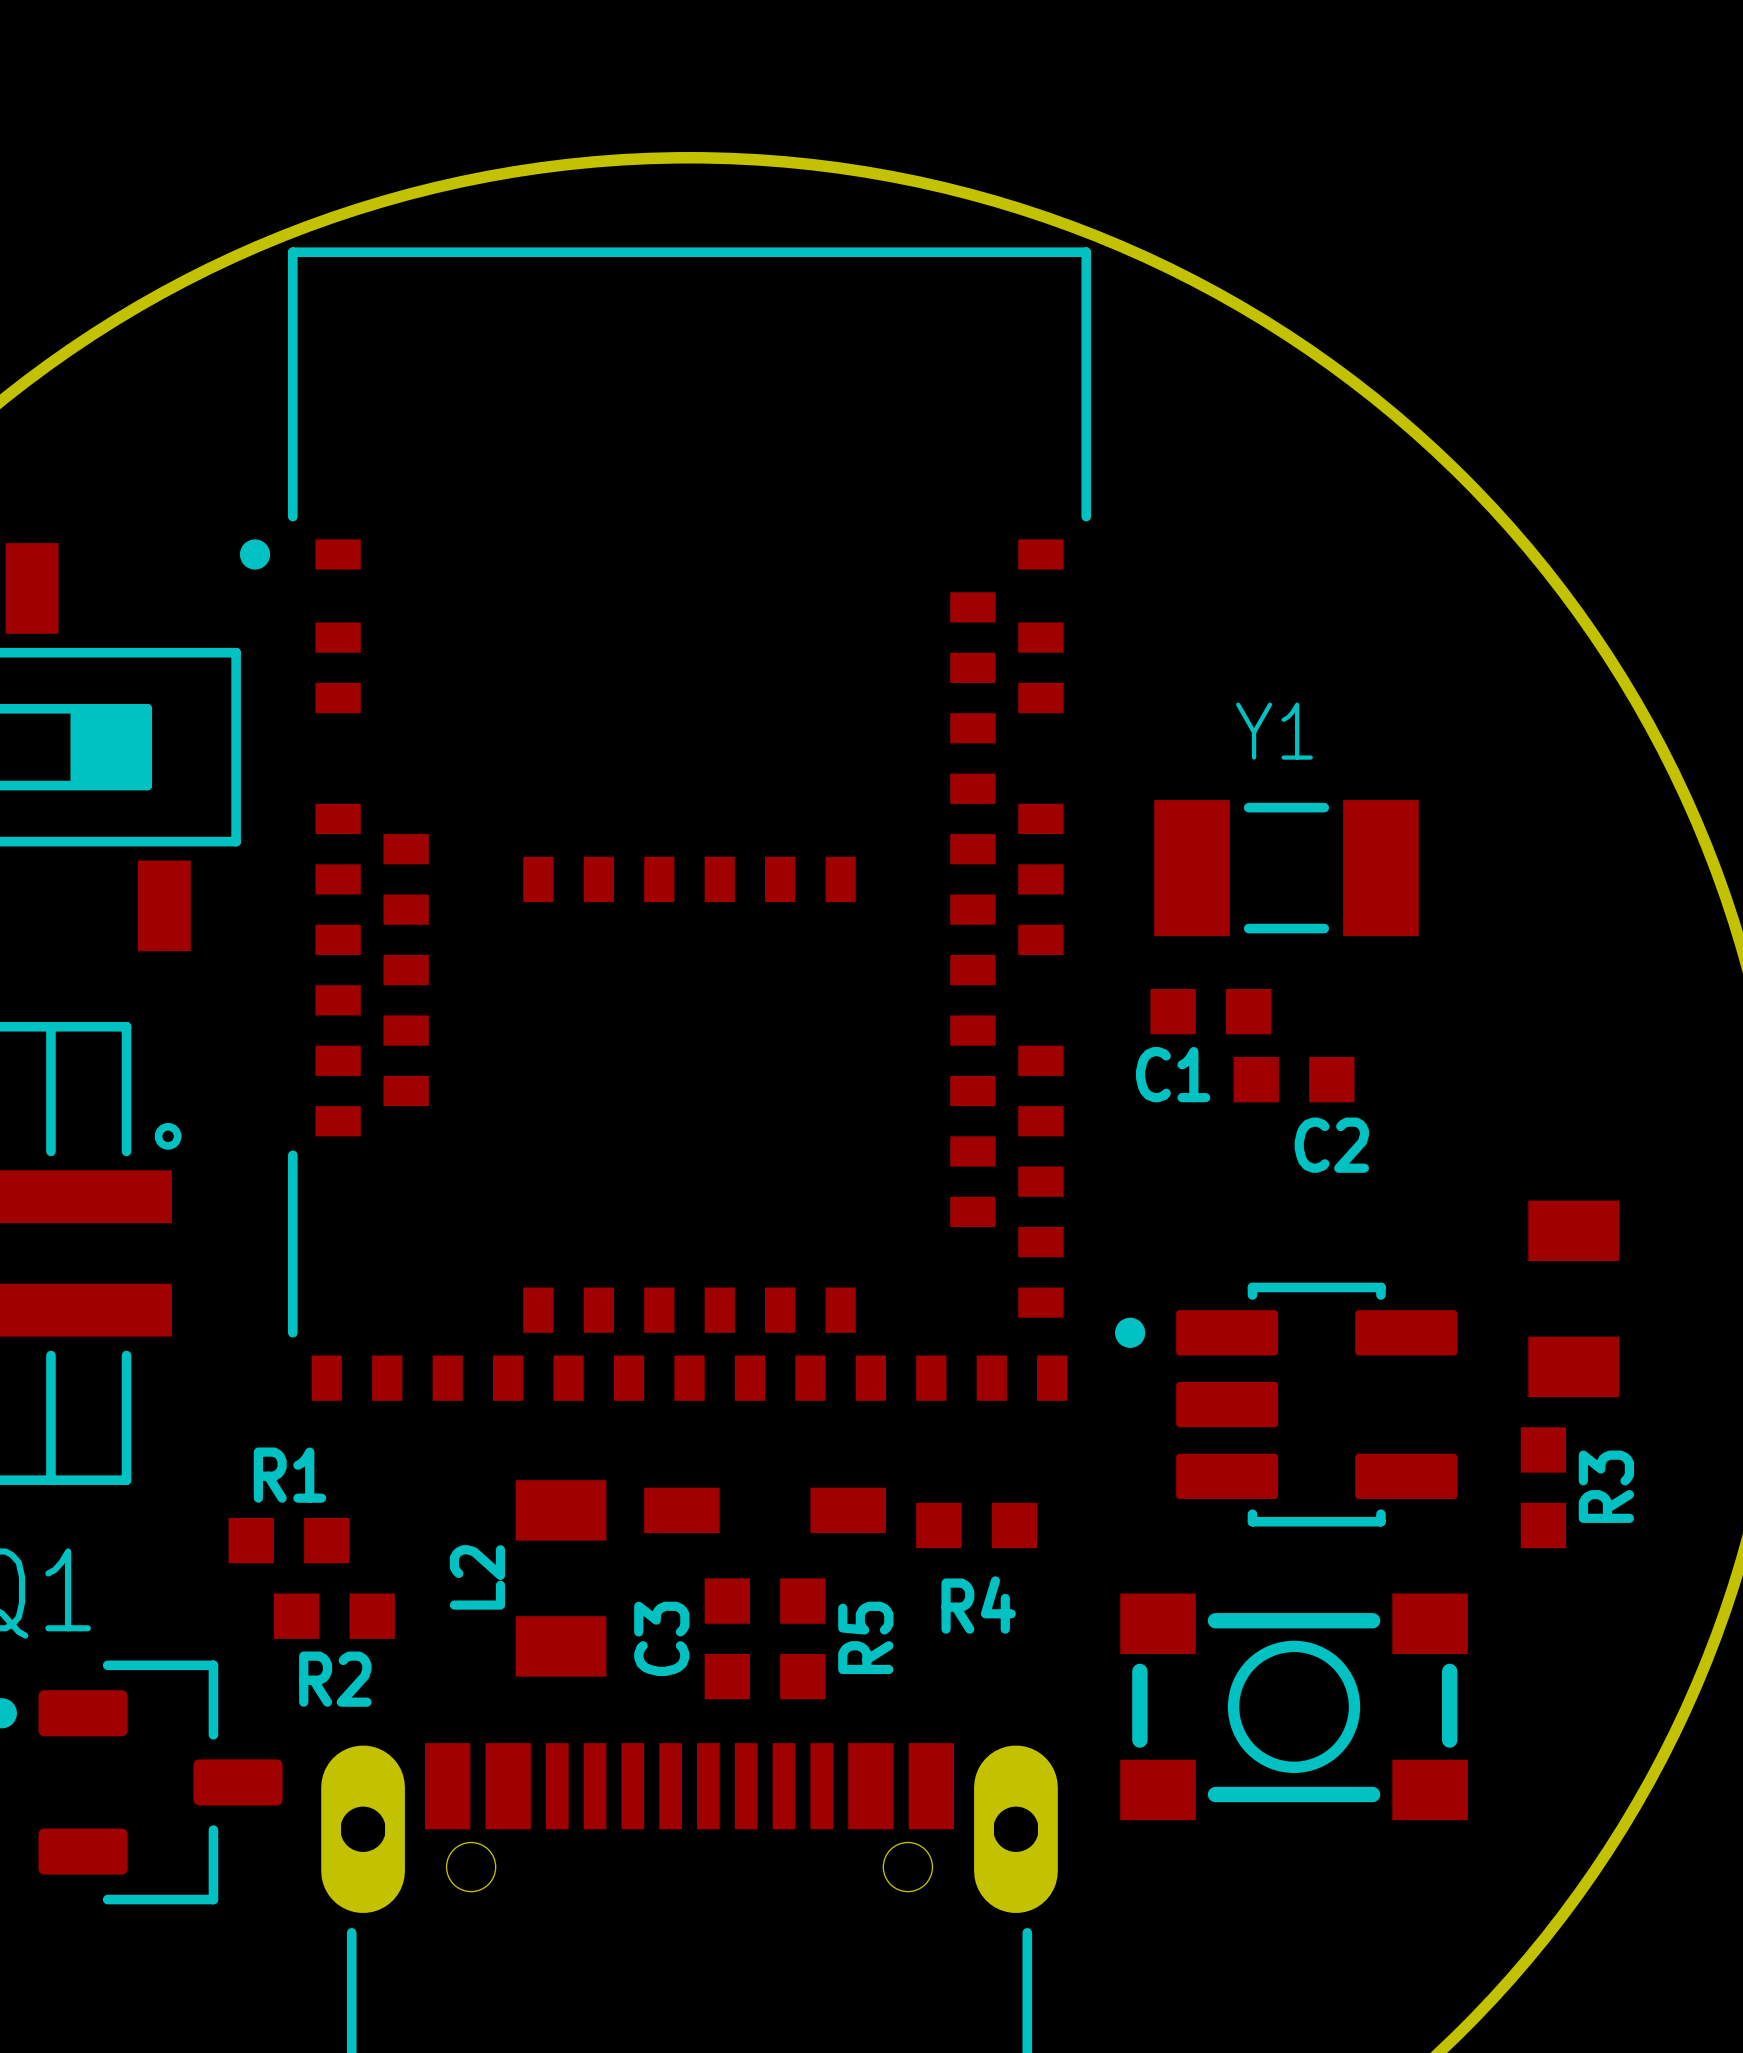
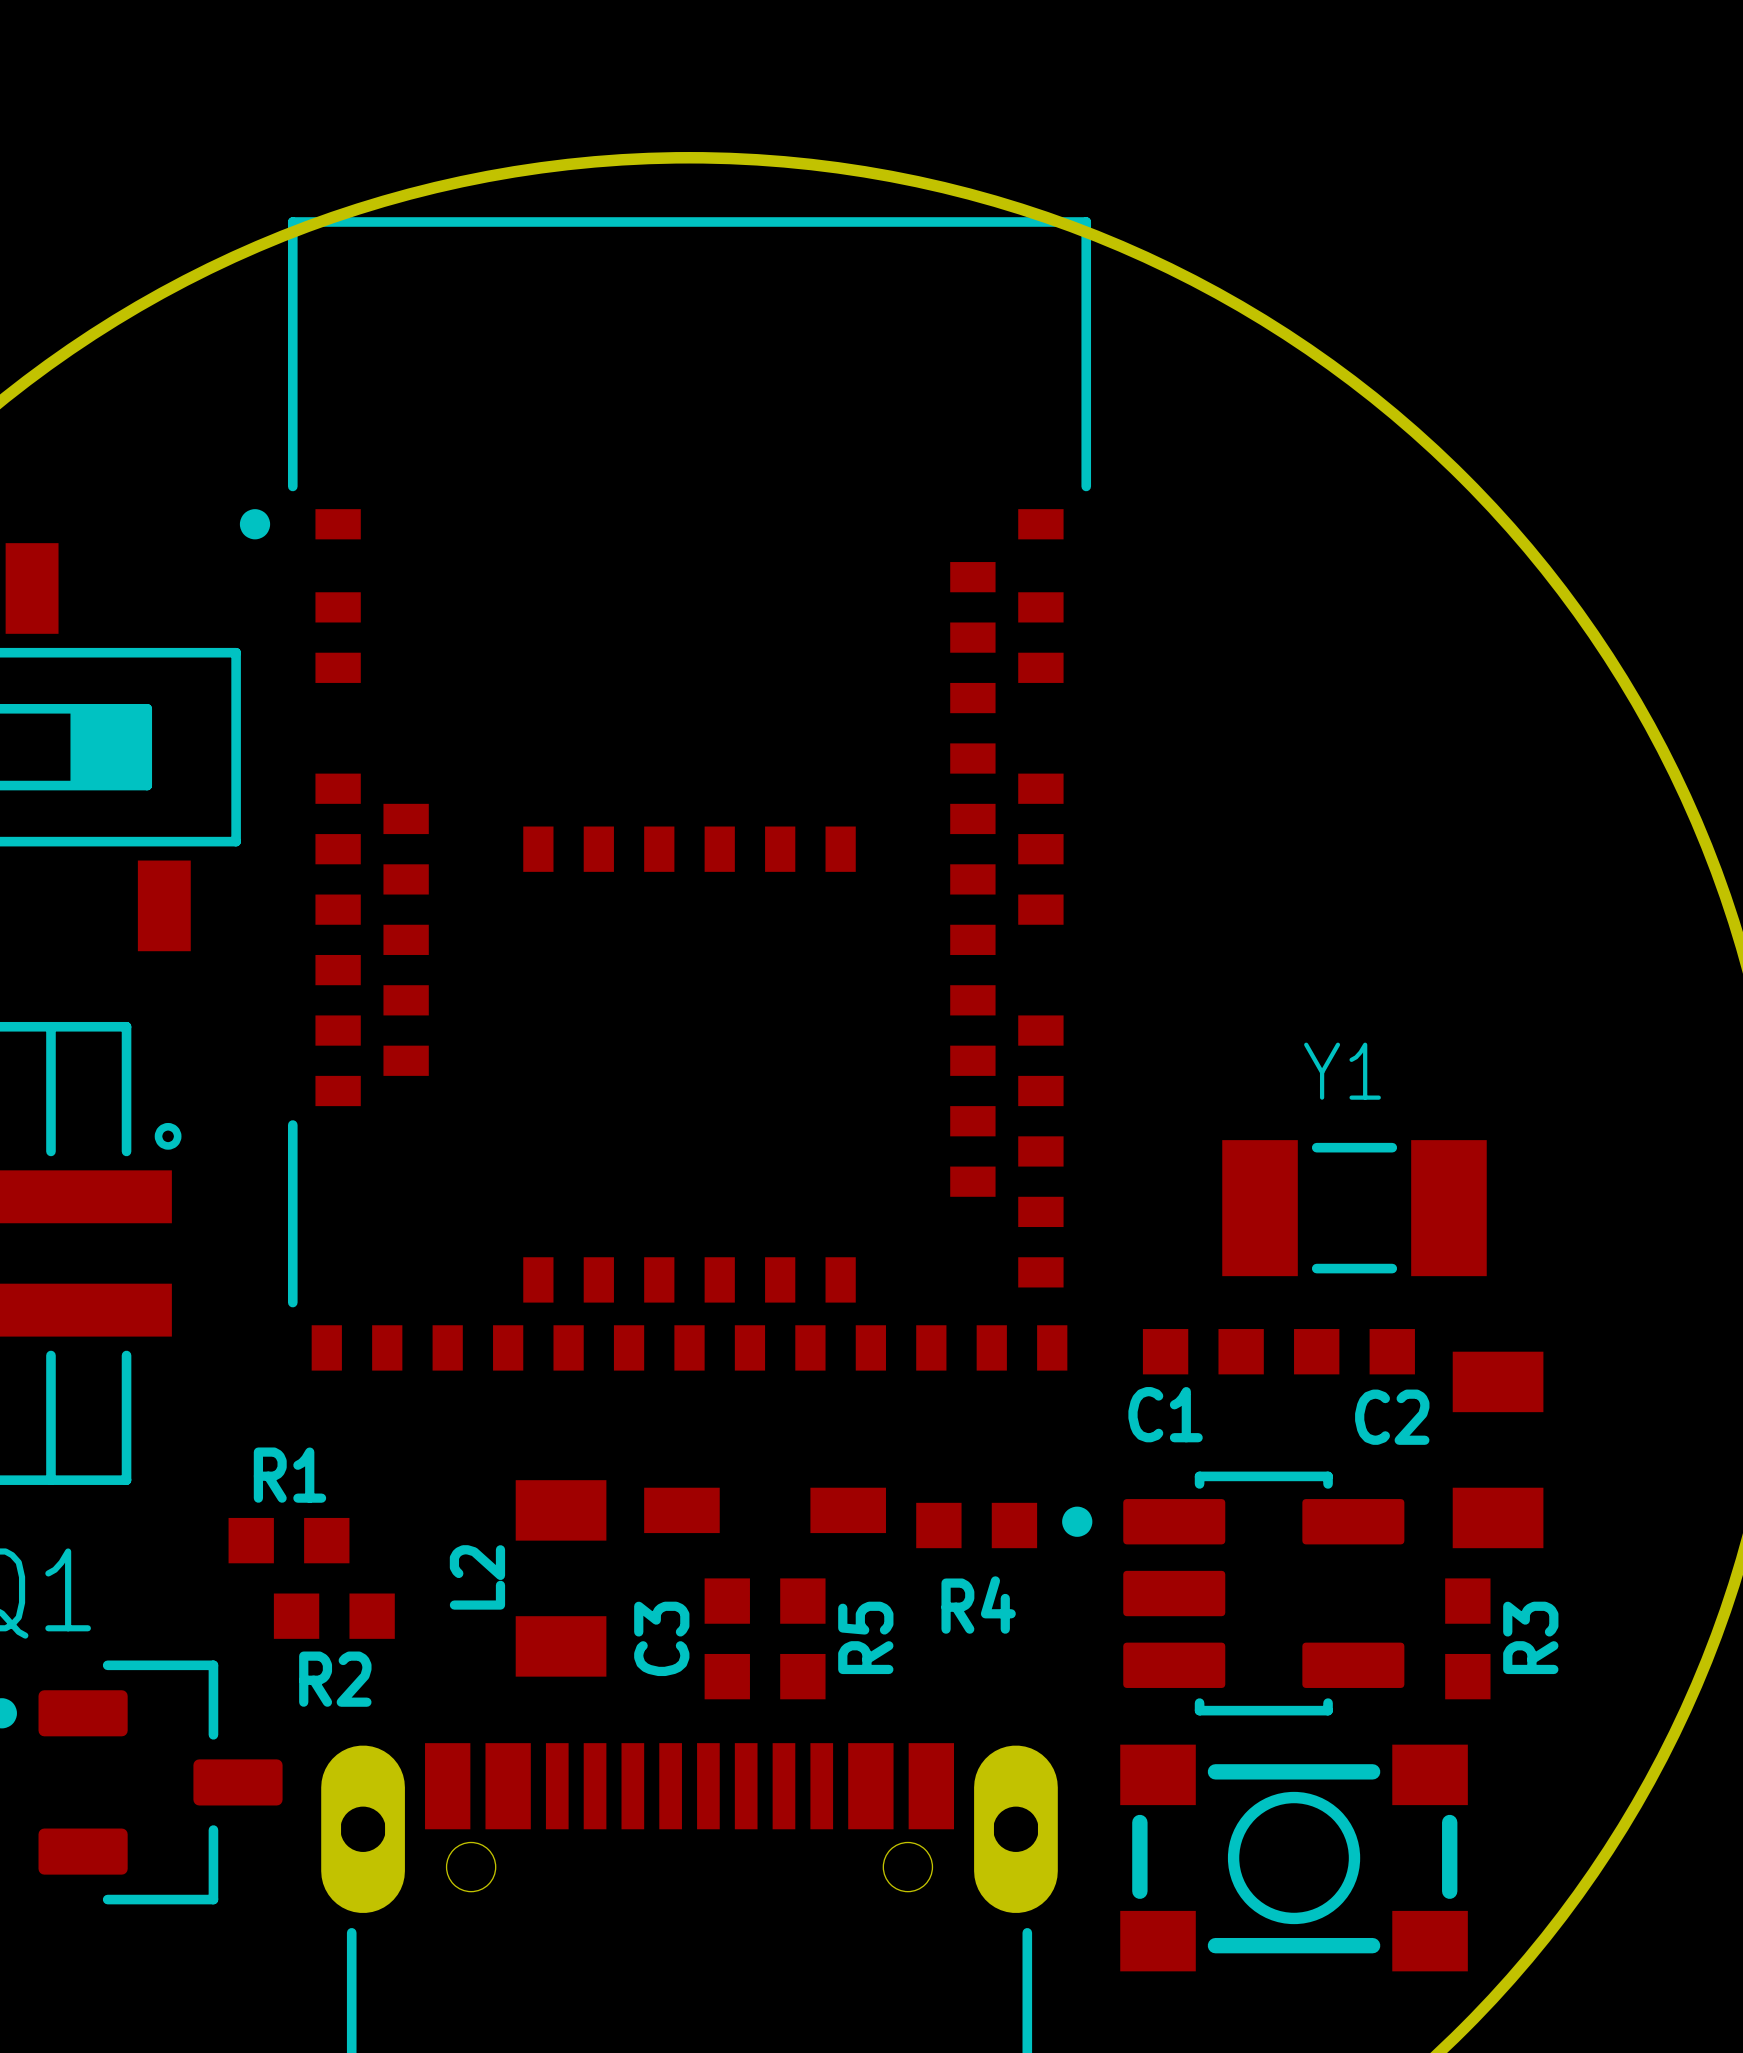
part position: (665, 824) -> (665, 793)
Y1 position: (1286, 868) -> (1354, 1208)
C1 position: (1210, 1011) -> (1203, 1351)
C2 position: (1294, 1079) -> (1354, 1351)
part position: (1573, 1298) -> (1498, 1449)
part position: (1286, 1404) -> (1233, 1593)
R3 position: (1543, 1487) -> (1467, 1638)
part position: (1294, 1706) -> (1294, 1858)

